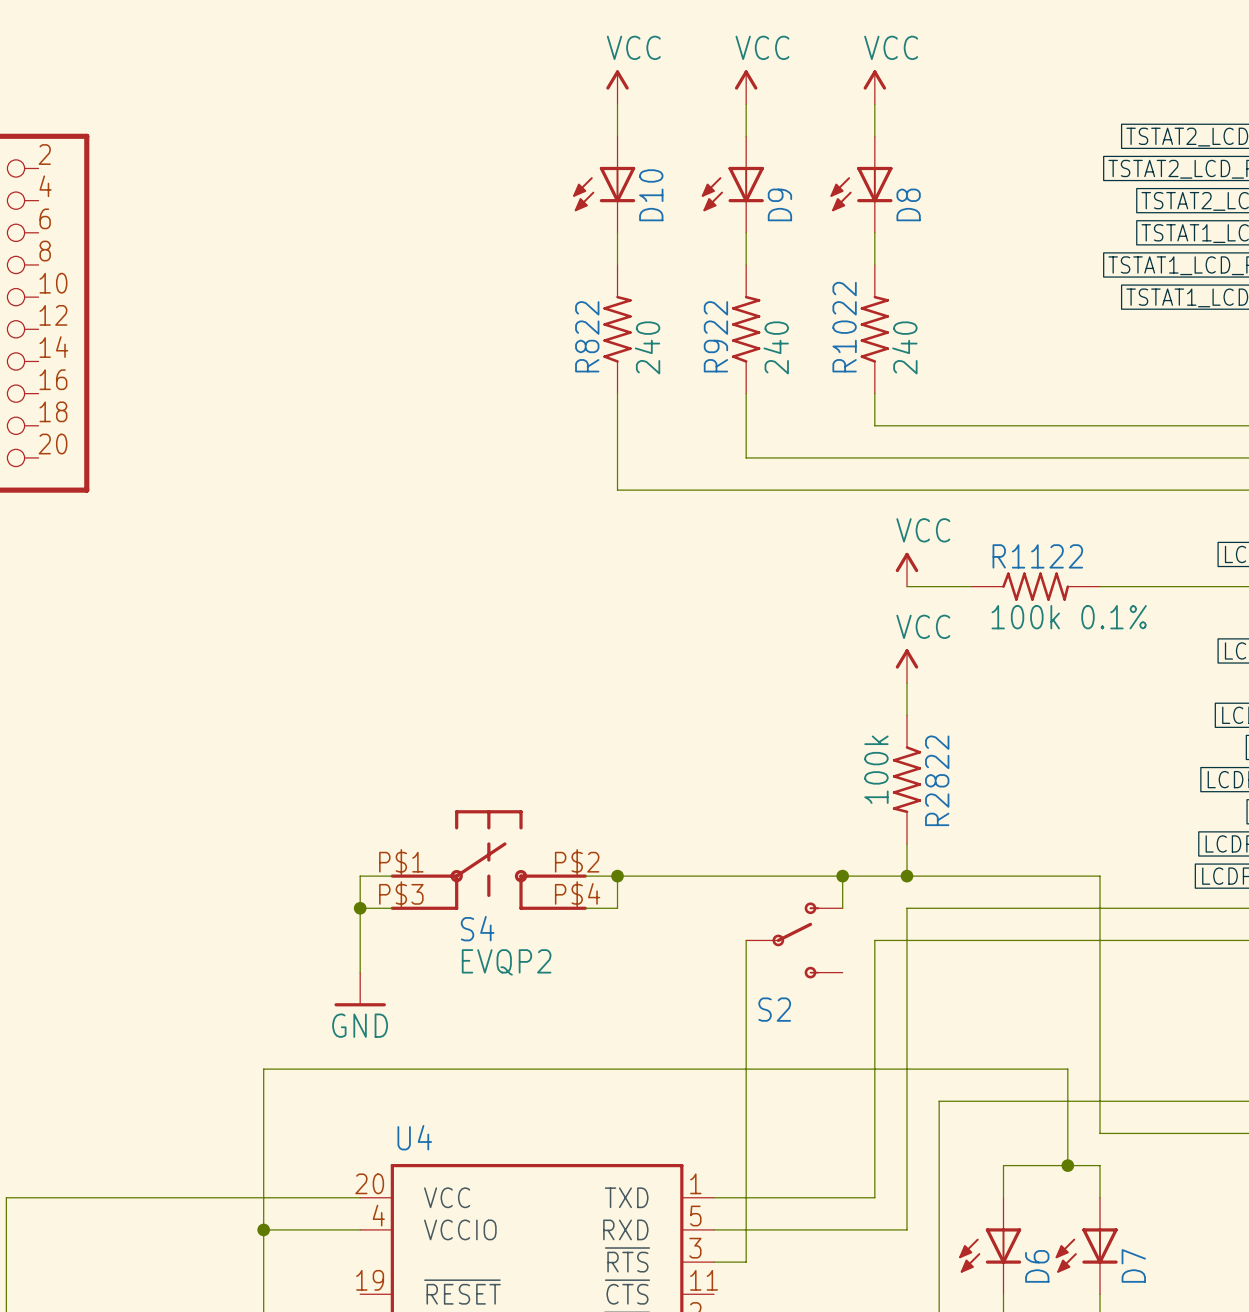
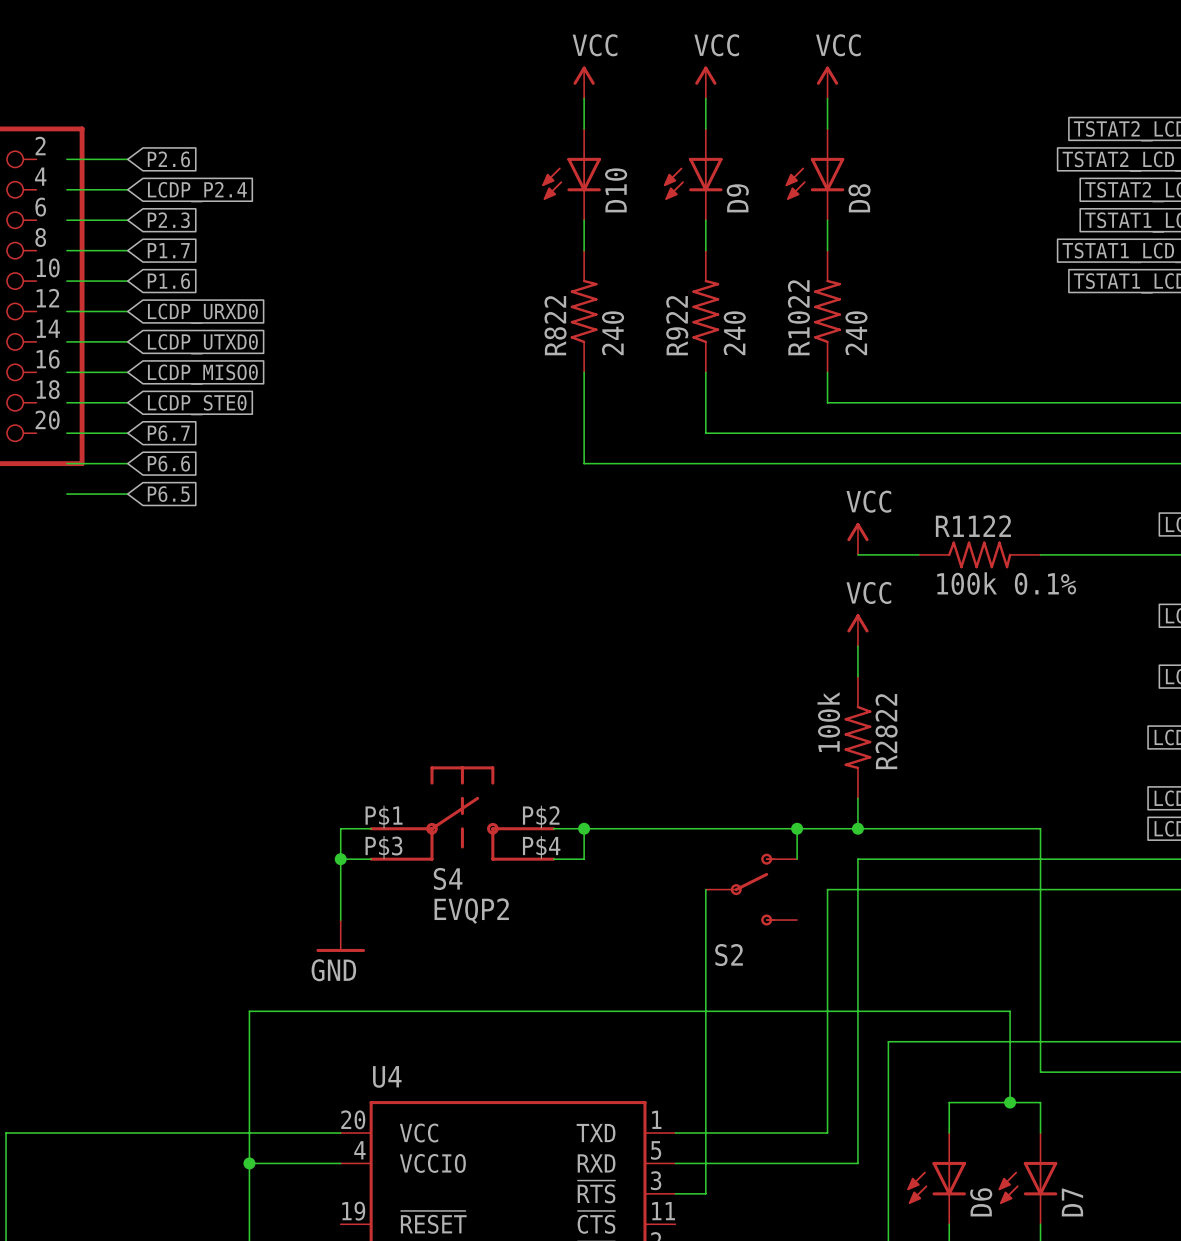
wire: none -> (66, 159) (127, 159)
global label: none -> P2.6 (168, 159)
wire: none -> (66, 189) (127, 189)
global label: none -> LCDP_P2.4 (197, 192)
wire: none -> (66, 220) (127, 220)
global label: none -> P2.3 (168, 220)
wire: none -> (66, 250) (127, 250)
global label: none -> P1.7 (168, 250)
wire: none -> (66, 281) (127, 281)
global label: none -> P1.6 (168, 281)
wire: none -> (66, 311) (127, 311)
global label: none -> LCDP_URXD0 (202, 313)
wire: none -> (66, 341) (127, 341)
global label: none -> LCDP_UTXD0 (202, 344)
wire: none -> (66, 372) (127, 372)
global label: none -> LCDP_MISO0 (202, 374)
wire: none -> (66, 402) (127, 402)
global label: none -> LCDP_STE0 (197, 405)
wire: none -> (66, 433) (127, 433)
global label: none -> P6.7 (168, 433)
wire: none -> (66, 463) (127, 463)
global label: none -> P6.6 (168, 463)
wire: none -> (66, 494) (127, 494)
global label: none -> P6.5 (168, 494)

